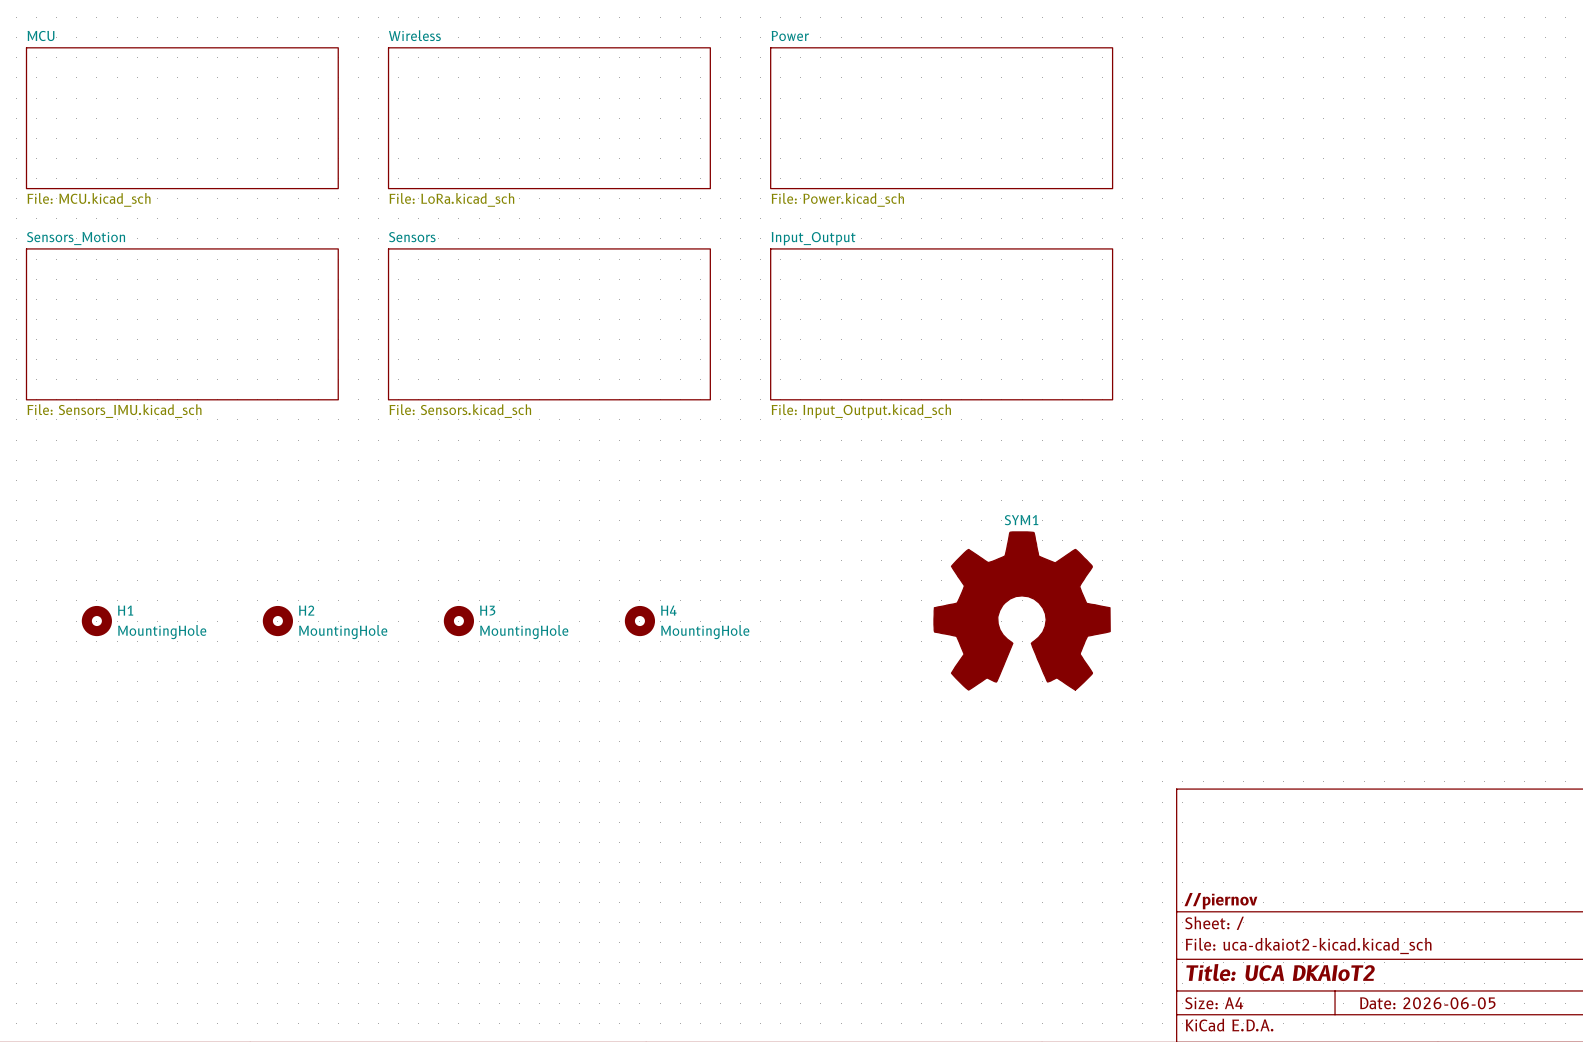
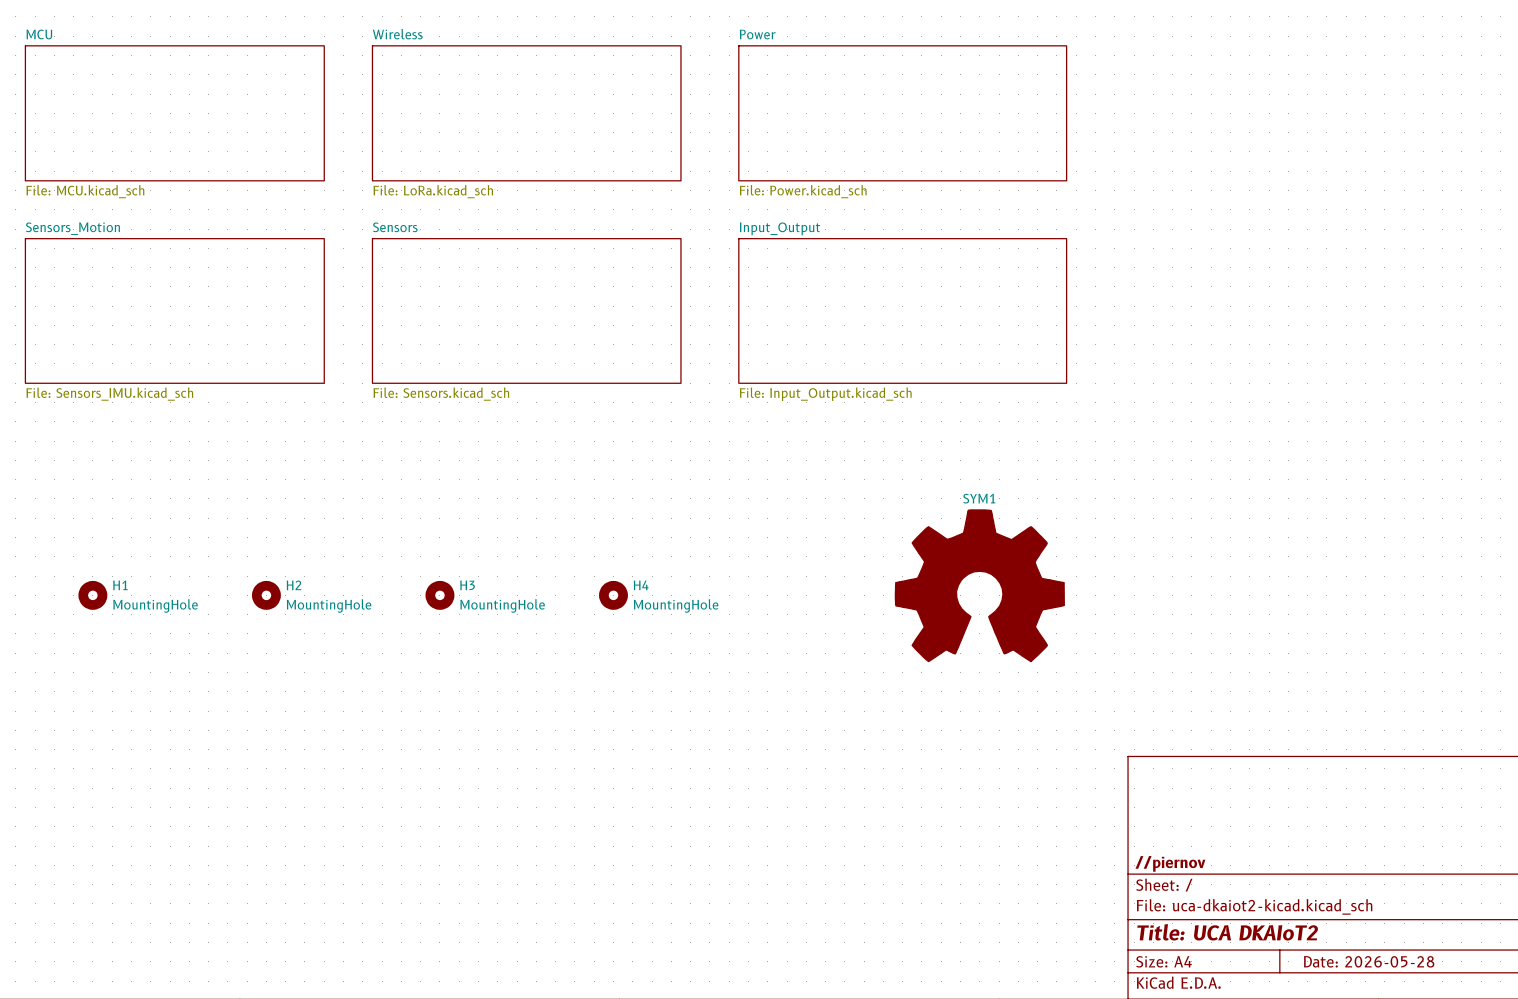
title block: Date: 2026-06-05 (1427, 1003) -> Date: 2026-05-28 (1369, 961)

